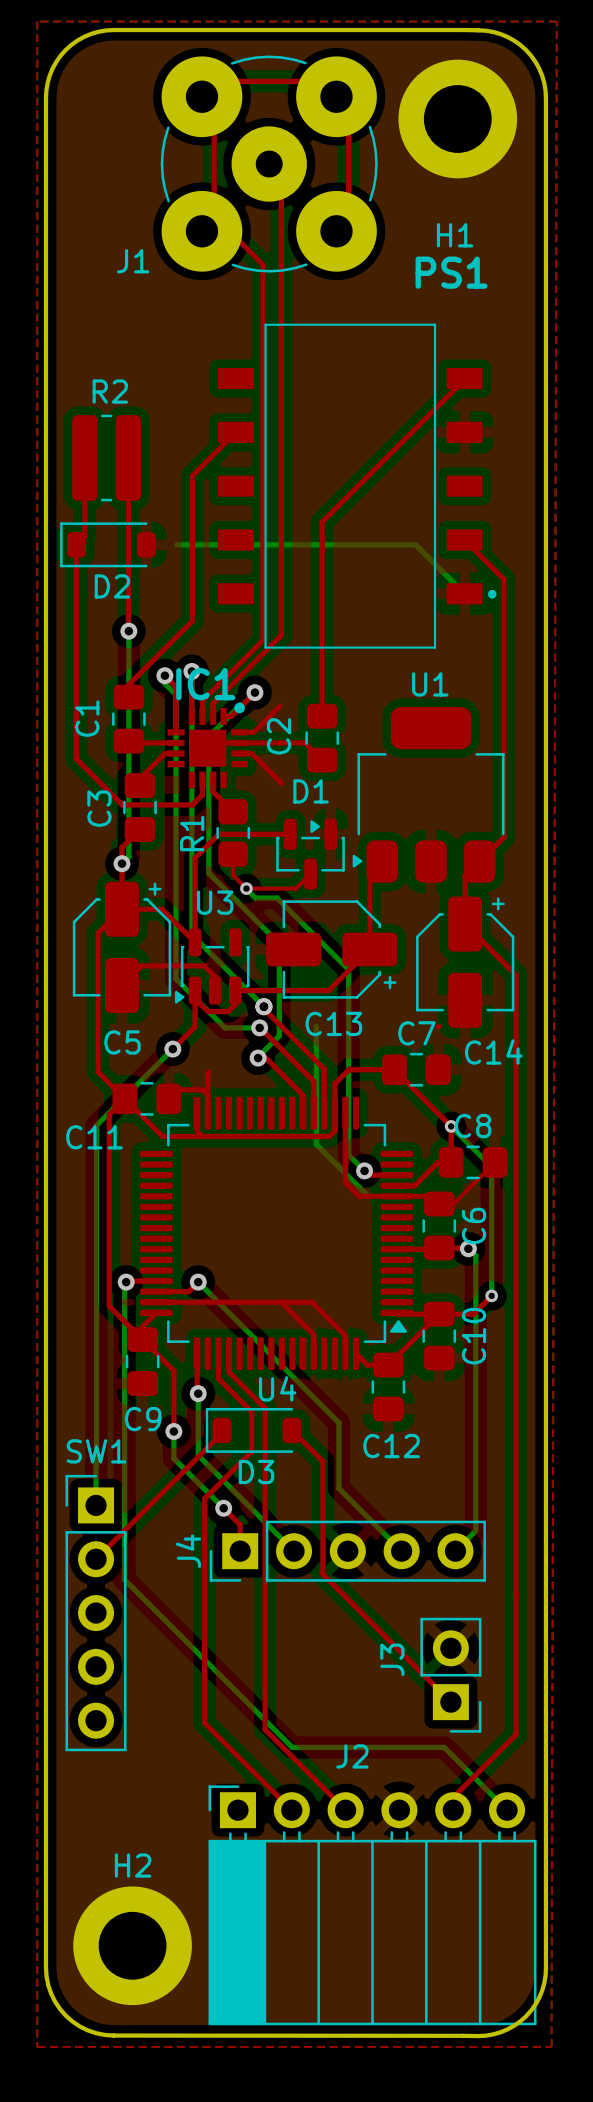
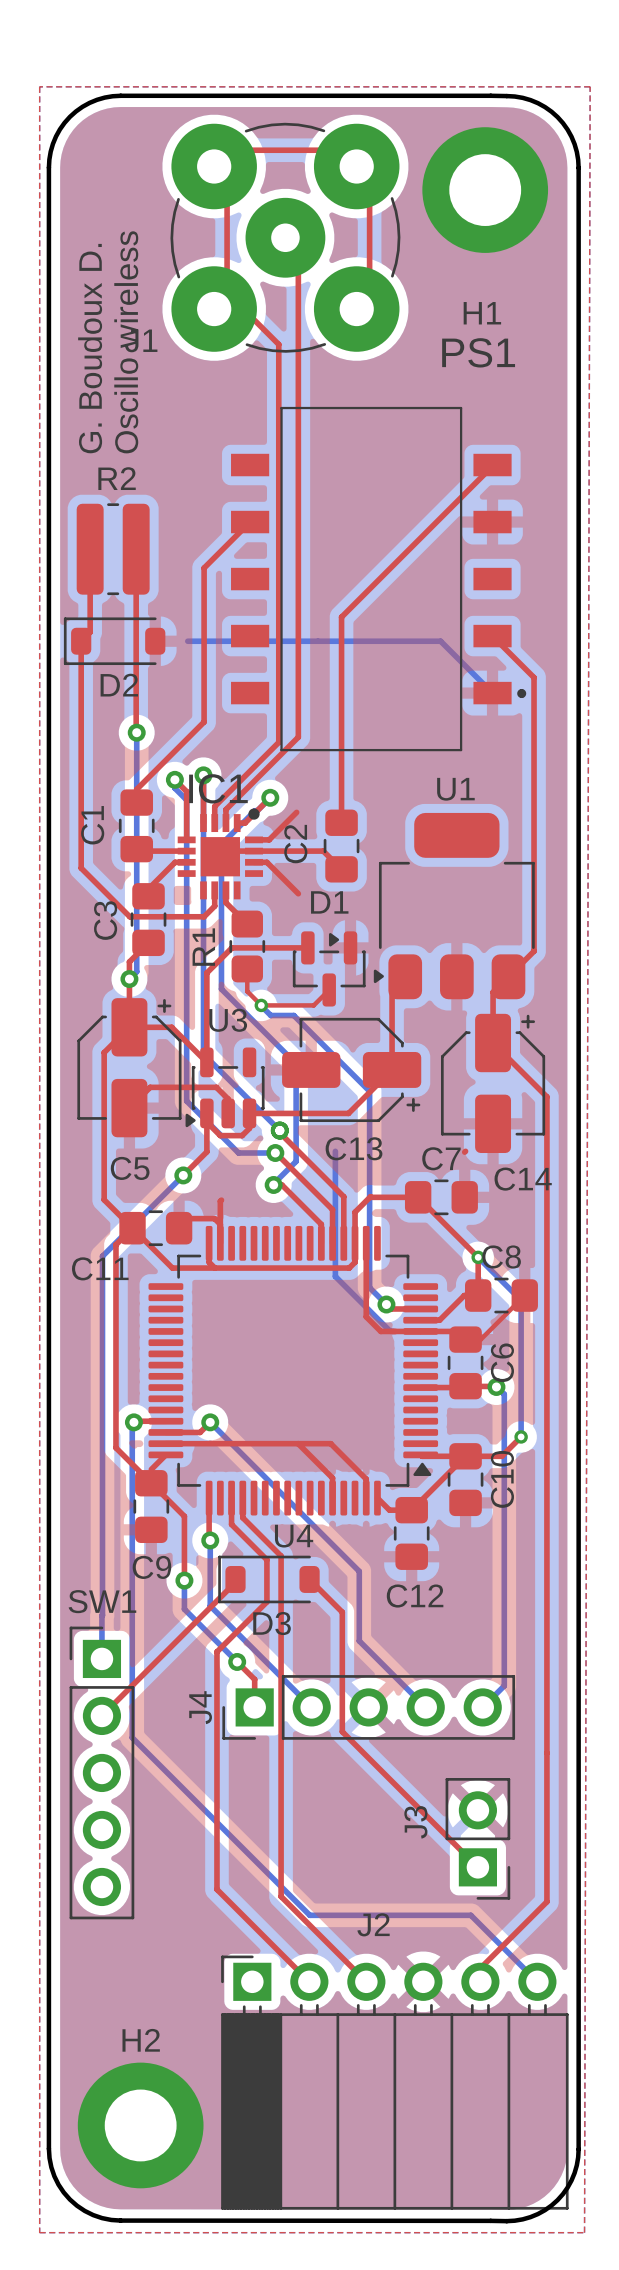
text: none -> Oscillo wireless (126, 342)
text: none -> G. Boudoux D. (90, 348)

